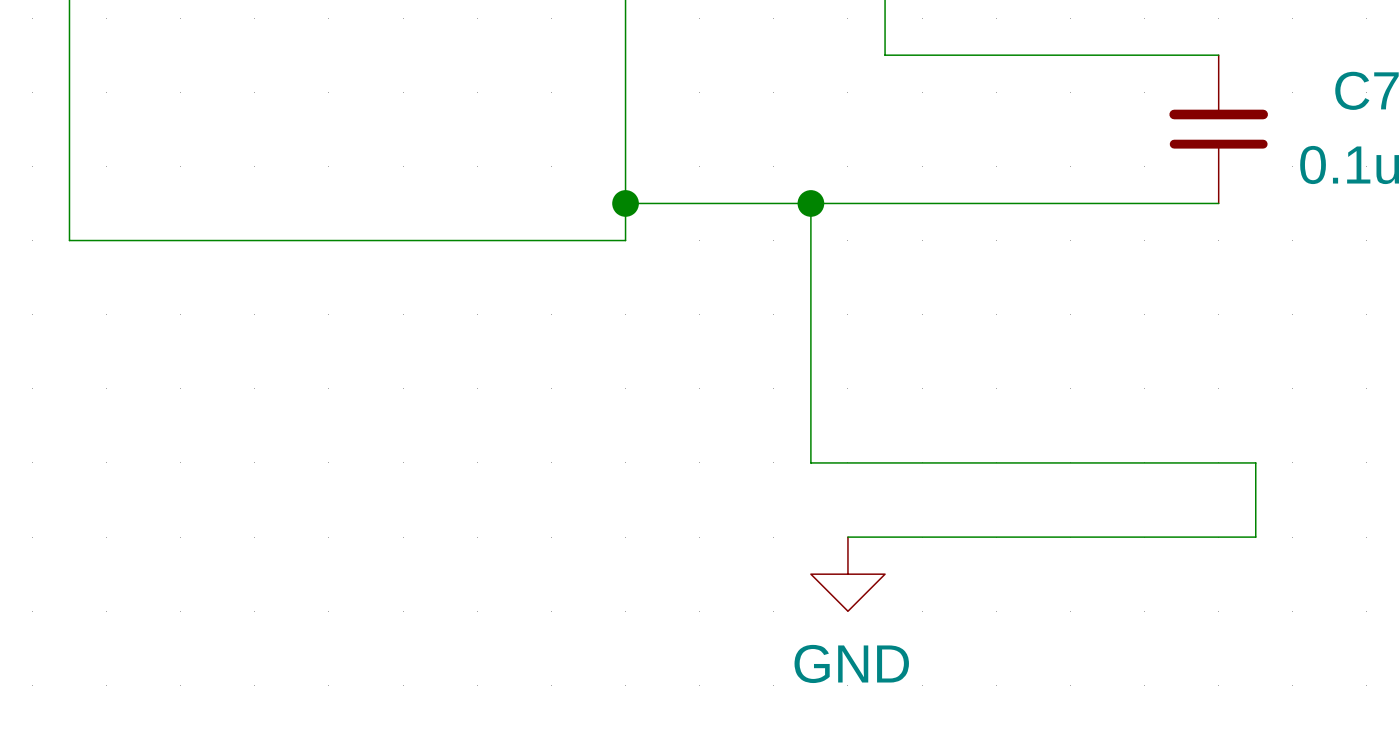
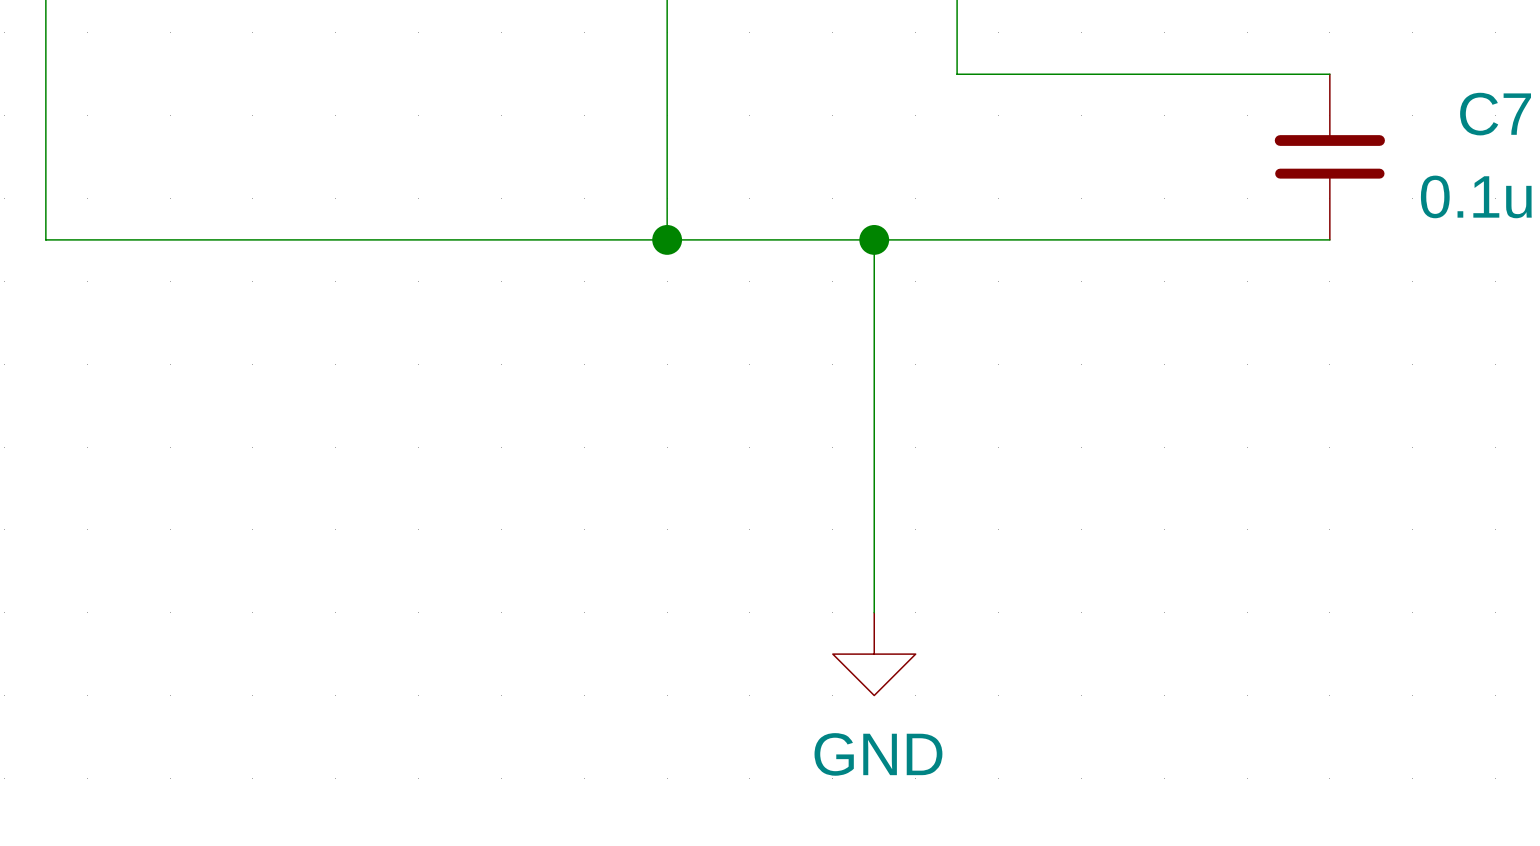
wire: (69, 203) (69, 240) (625, 240) (625, 203) -> (45, 239) (667, 239)
wire: (810, 462) (1255, 462) (1255, 537) (847, 537) -> (874, 529) (874, 612)
power symbol position: GND (847, 574) -> GND (874, 654)

